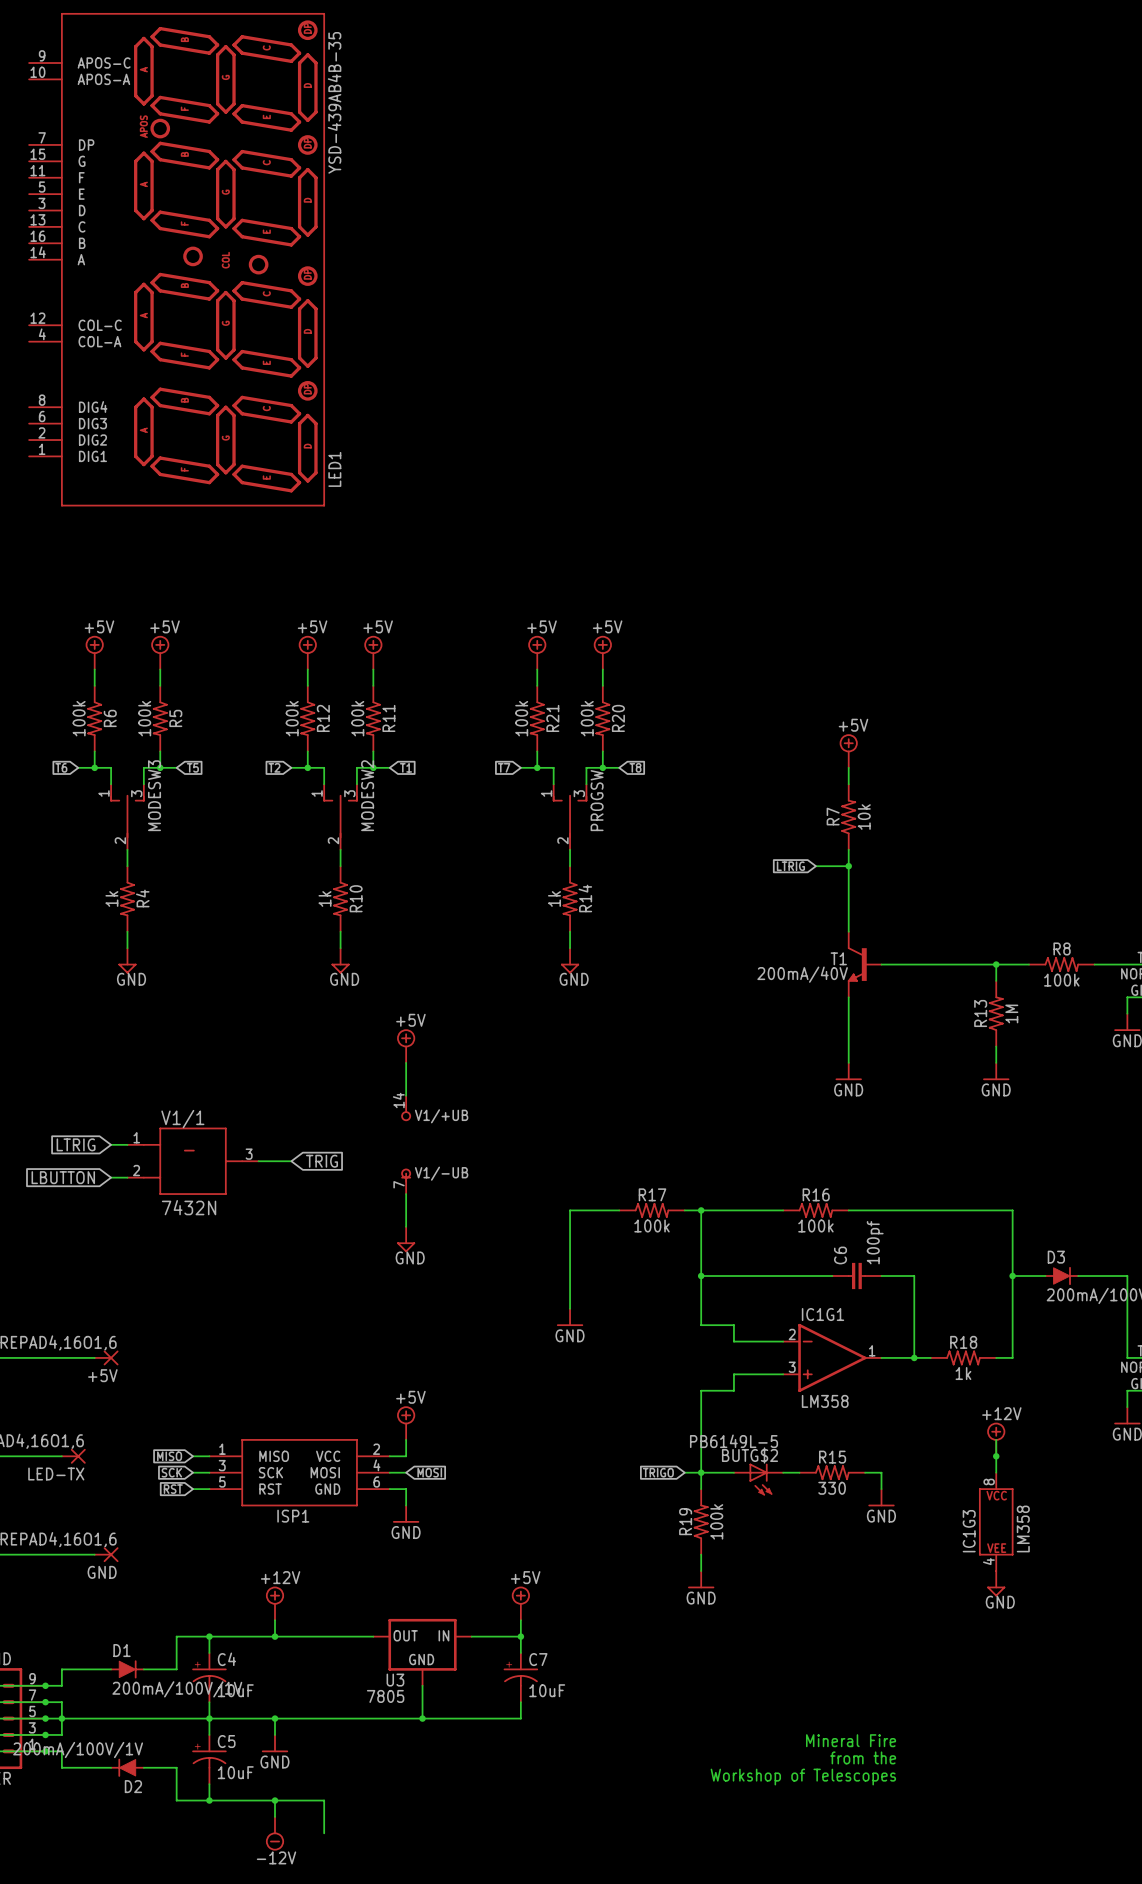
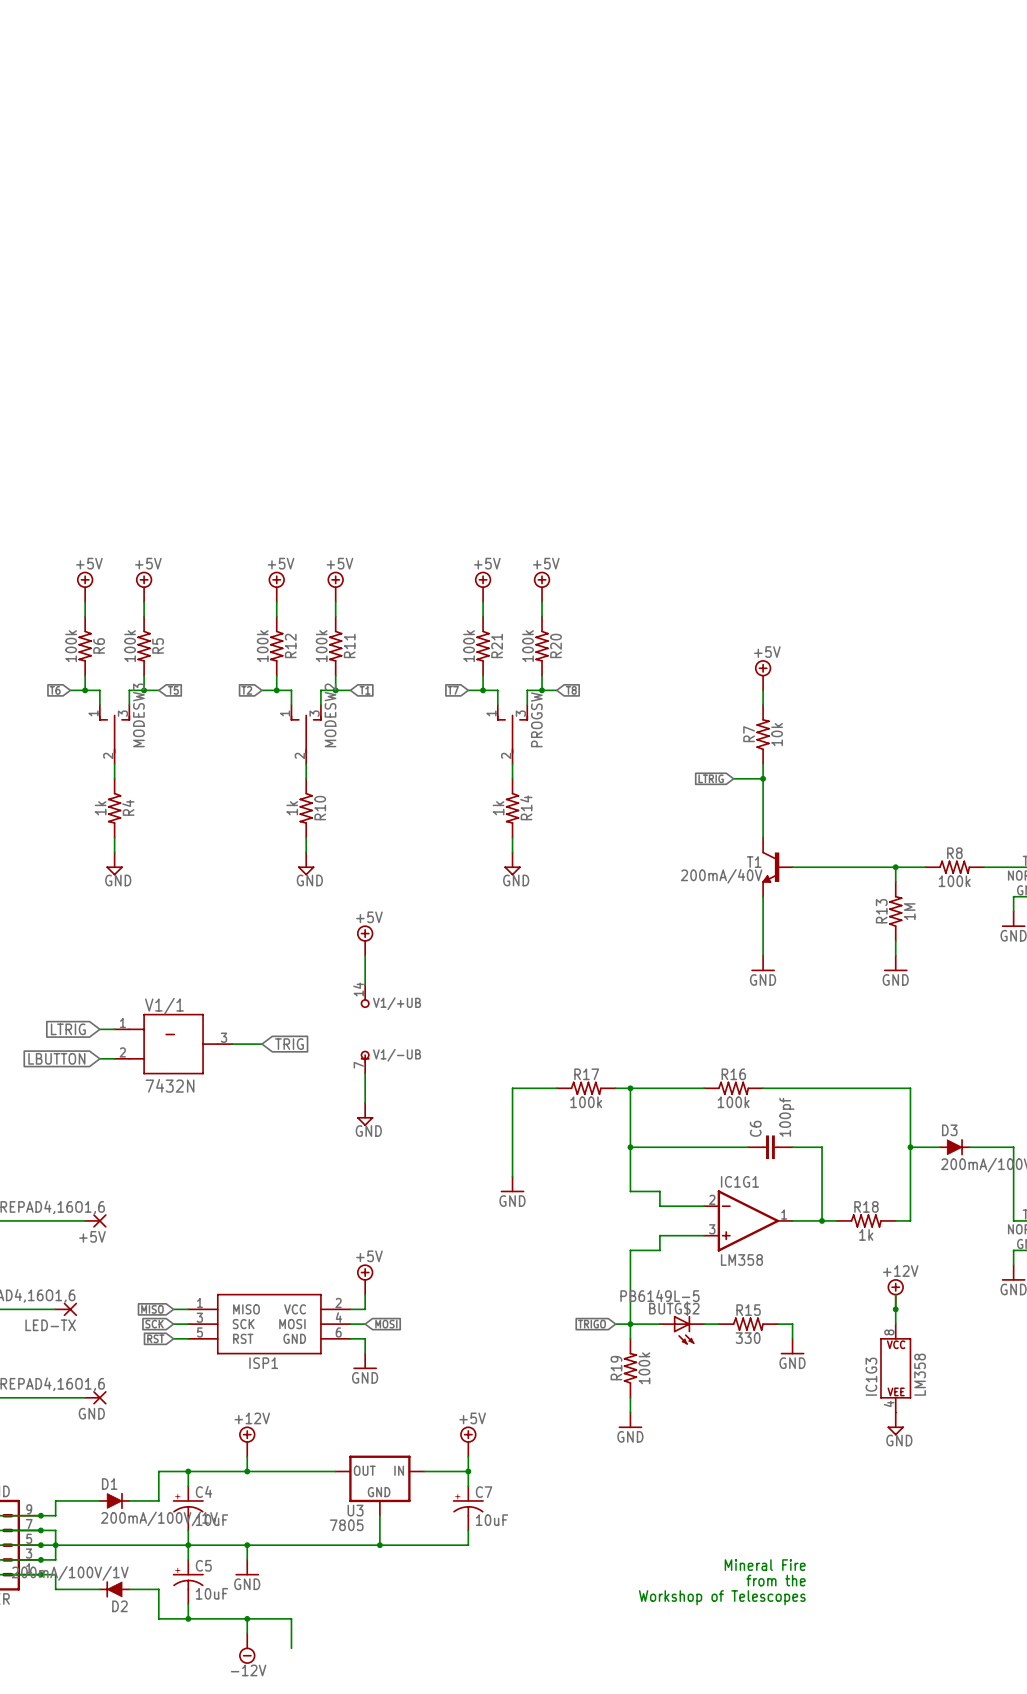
LED1: YSD-439AB4B-35 (177, 259) -> none

